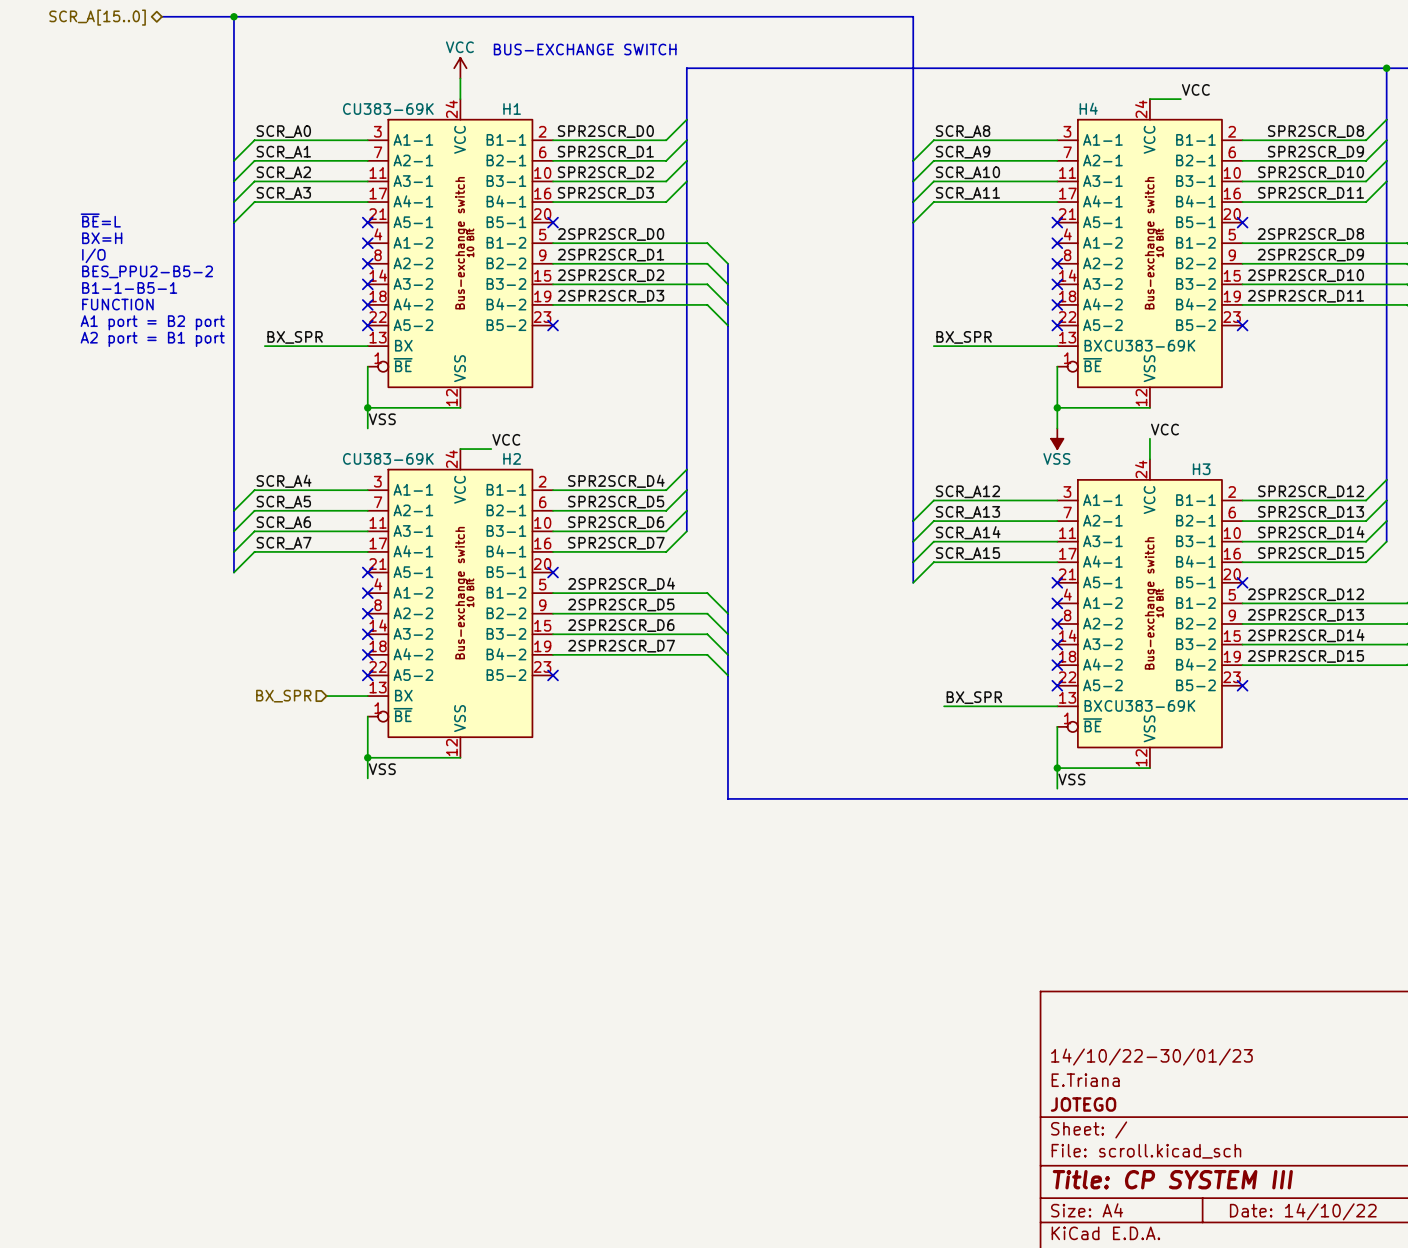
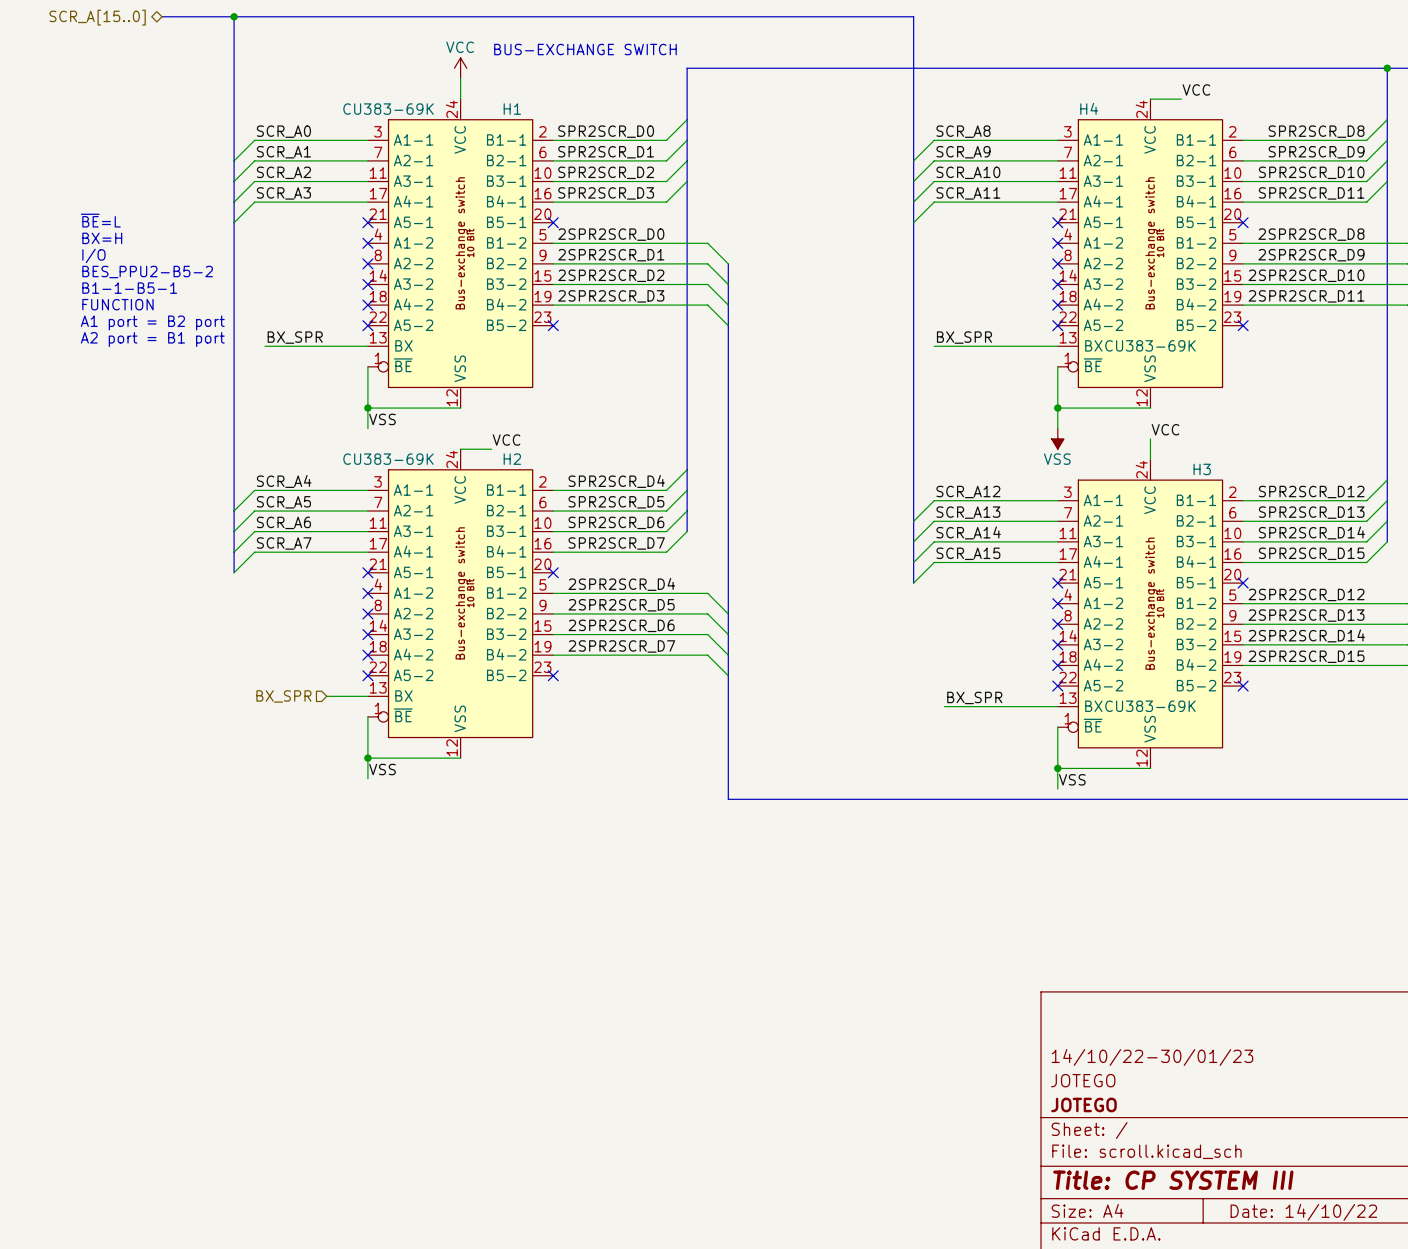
title block: E.Triana (1085, 1080) -> JOTEGO (1083, 1080)

